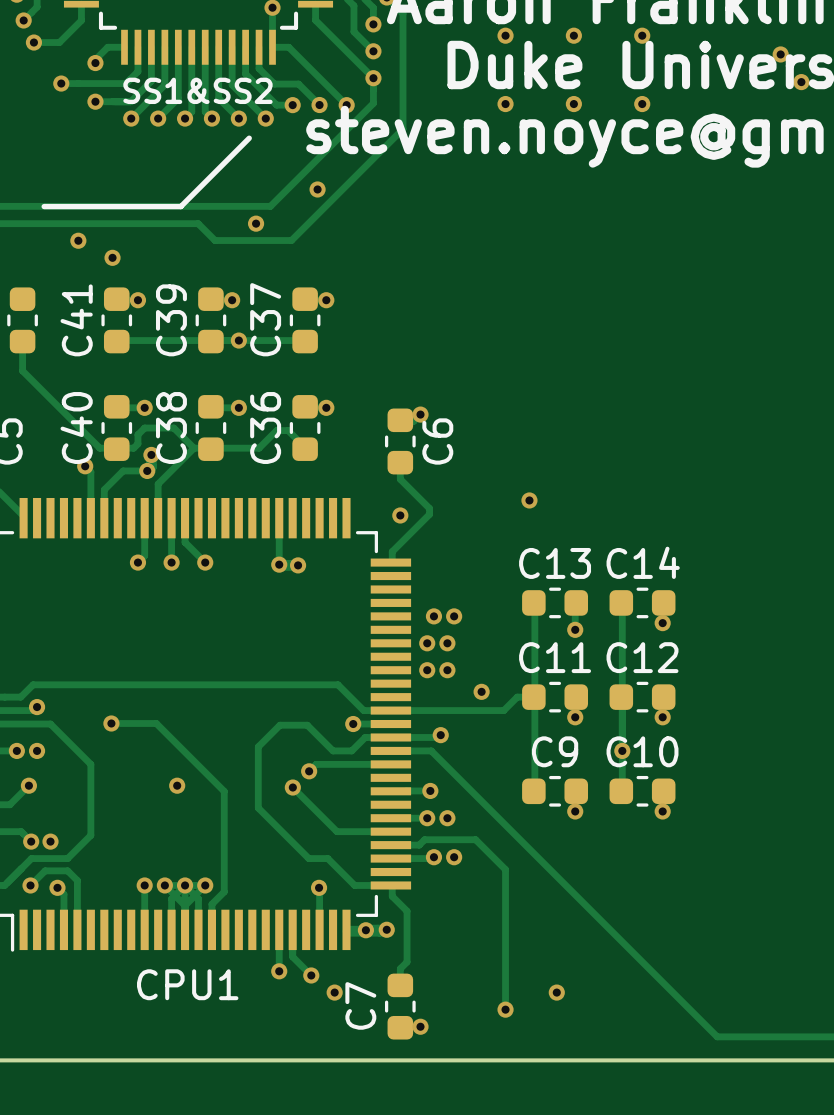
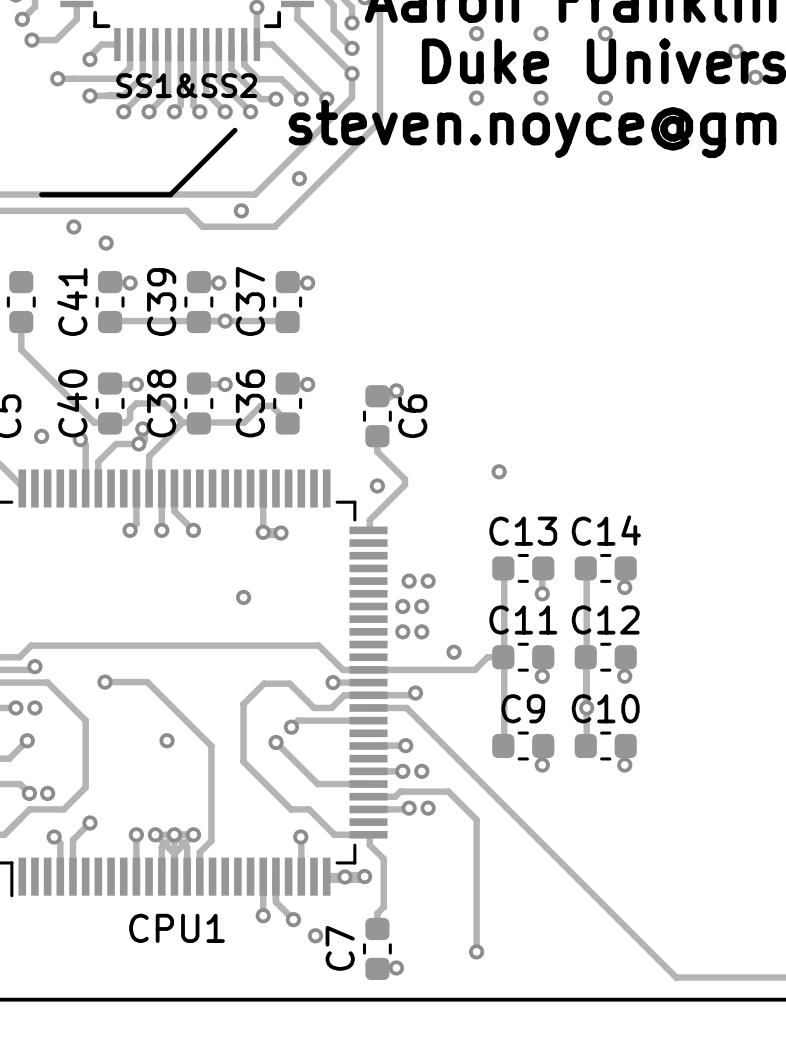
via: none -> (41, 436)
via: none -> (243, 597)
track: (30, 885) (45, 870) (67, 870) (77, 880) (77, 890) -> (89, 822) (72, 839)
via position: (30, 885) -> (89, 822)
via: (556, 992) -> none

